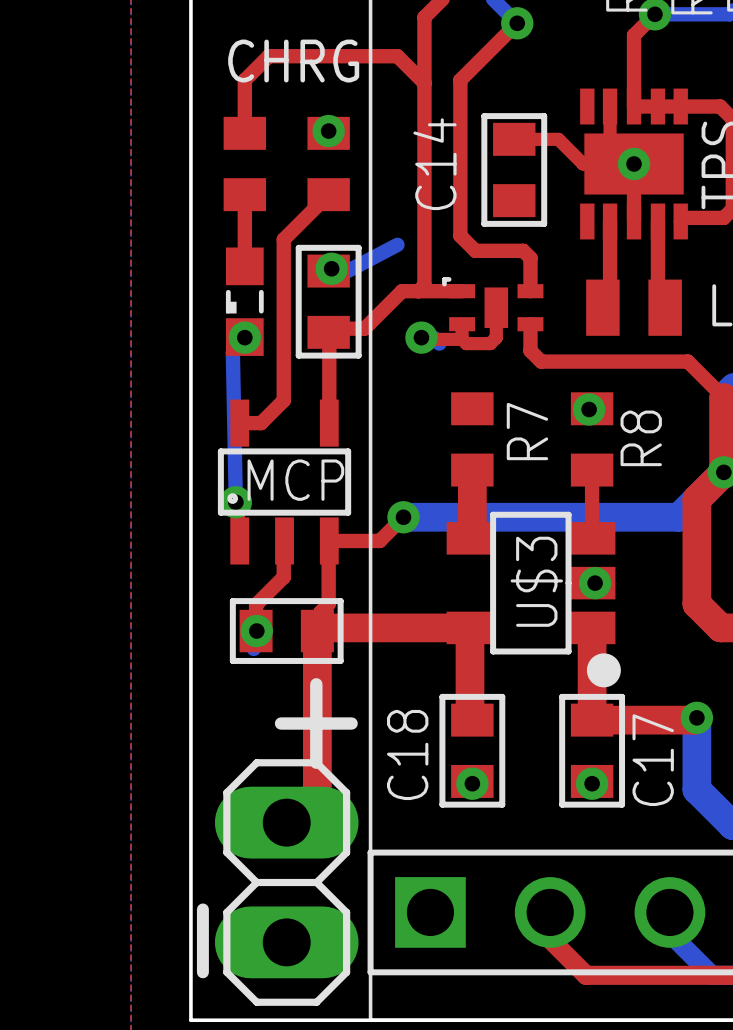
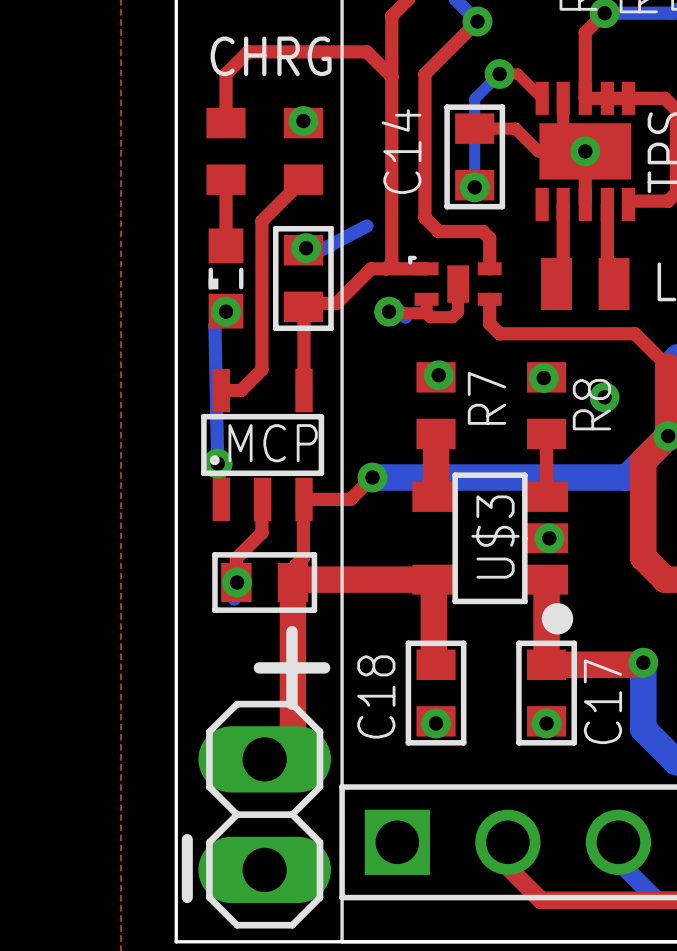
top track: none -> (499, 74) (517, 74) (542, 98)
bottom track: none -> (499, 74) (474, 98) (474, 187)
via: none -> (499, 74)
via: none -> (474, 187)
via: none -> (438, 375)
via: none -> (604, 397)

